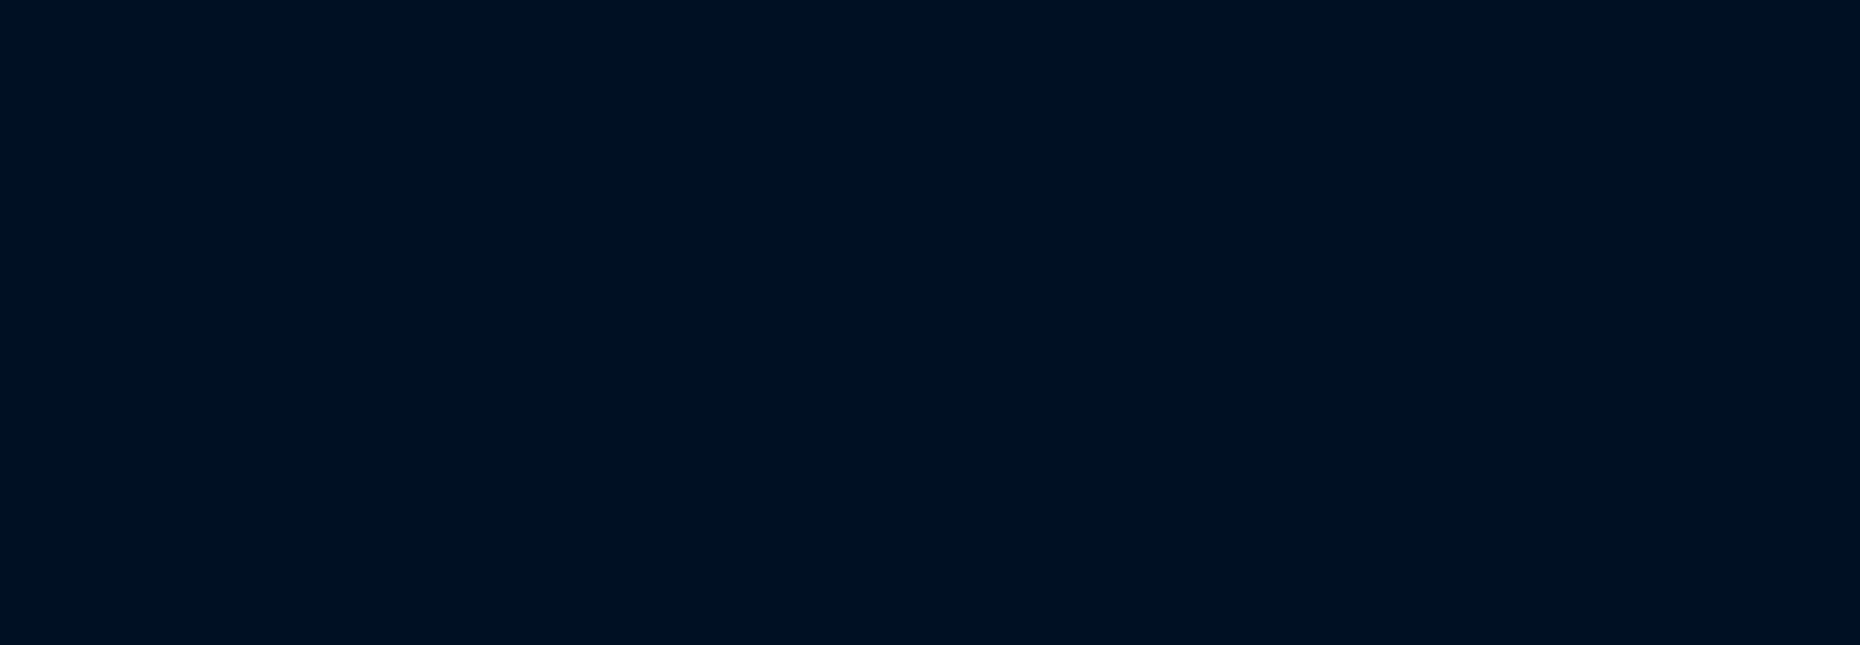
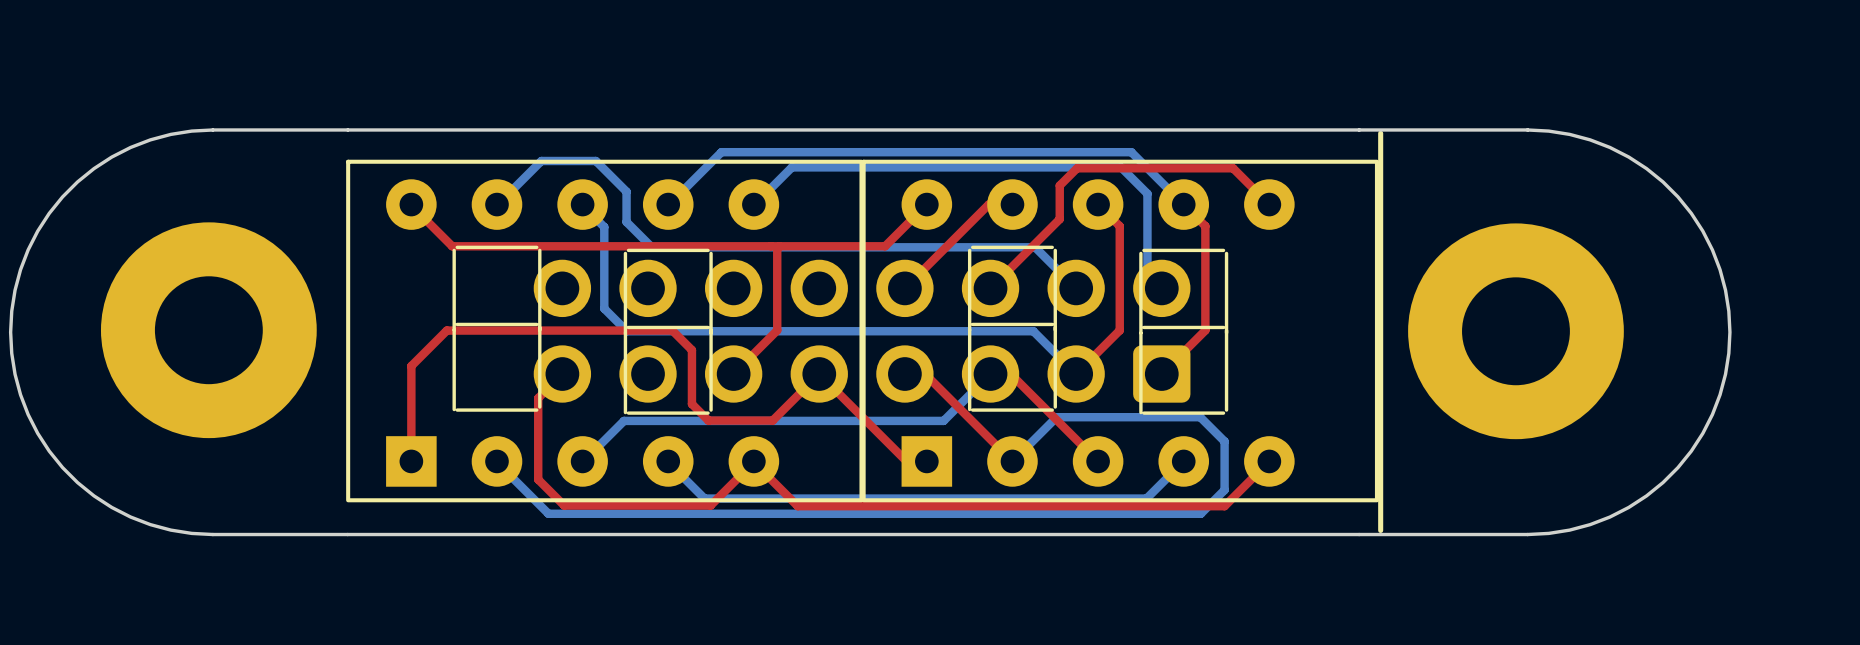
board edge: none -> (212, 129) (1548, 131) (1590, 139) (1628, 157) (1663, 181) (1677, 196) (1702, 231) (1720, 269) (1728, 311) (1728, 353) (1725, 374) (1712, 414) (1691, 451) (1677, 467) (1646, 495) (1609, 517) (1590, 524) (1548, 533) (191, 533) (150, 524) (130, 517) (94, 495) (62, 467) (37, 433) (20, 394) (11, 353) (11, 311) (20, 269) (37, 231) (49, 213) (77, 181) (111, 157) (150, 139) (191, 131) (212, 129)
line: none -> (1380, 133) (1380, 530)
top track: none -> (926, 204) (885, 246) (452, 246) (411, 205)
top track: none -> (1012, 204) (988, 204) (904, 288)
top track: none -> (1098, 204) (1119, 226) (1119, 330) (1076, 374)
top track: none -> (1183, 204) (1205, 226) (1205, 330) (1161, 374)
bottom track: none -> (1183, 204) (1131, 152) (721, 152) (668, 205) (652, 205)
top track: none -> (1269, 204) (1233, 168) (1077, 168) (1059, 185) (1059, 219) (990, 288)
bottom track: none -> (496, 205) (541, 160) (595, 160) (626, 191) (626, 222) (651, 247) (1035, 247) (1076, 288)
bottom track: none -> (582, 205) (604, 227) (604, 308) (626, 331) (1033, 331) (1076, 374)
bottom track: none -> (739, 205) (753, 205) (791, 167) (1121, 167) (1147, 193) (1147, 274) (1161, 288)
top track: none -> (779, 246) (777, 248) (777, 330) (733, 374)
part: none -> (208, 330)
part: none -> (604, 331)
part: none -> (862, 331)
part: none -> (1120, 331)
part: none -> (1515, 331)
top track: none -> (562, 374) (538, 398) (538, 479) (564, 505) (710, 505) (753, 462) (797, 506) (1224, 506) (1269, 461)
top track: none -> (904, 374) (925, 374) (1012, 461)
top track: none -> (990, 374) (1010, 374) (1098, 461)
bottom track: none -> (1010, 374) (990, 374) (943, 420) (624, 420) (582, 462) (598, 462)
top track: none -> (926, 461) (906, 461) (819, 374) (772, 420) (708, 420) (691, 404) (691, 350) (672, 330) (446, 330) (411, 366) (411, 462)
bottom track: none -> (1012, 461) (1056, 417) (1200, 417) (1224, 441) (1224, 490) (1200, 513) (548, 513) (496, 462)
bottom track: none -> (1165, 461) (1183, 461) (1146, 498) (704, 498) (668, 462)

